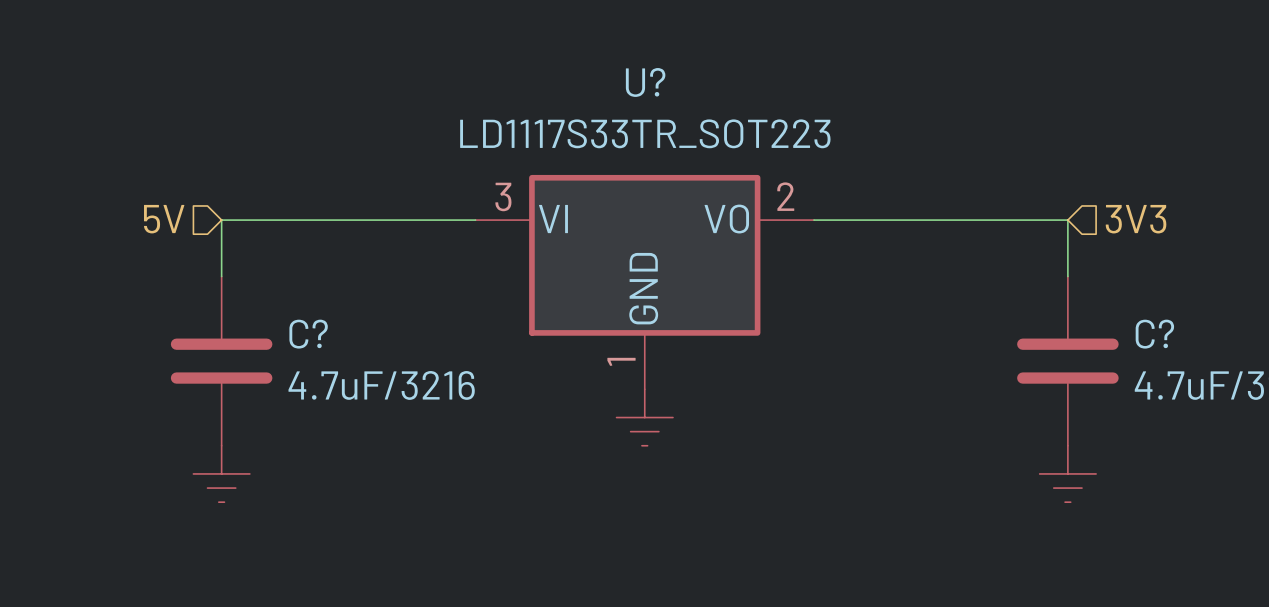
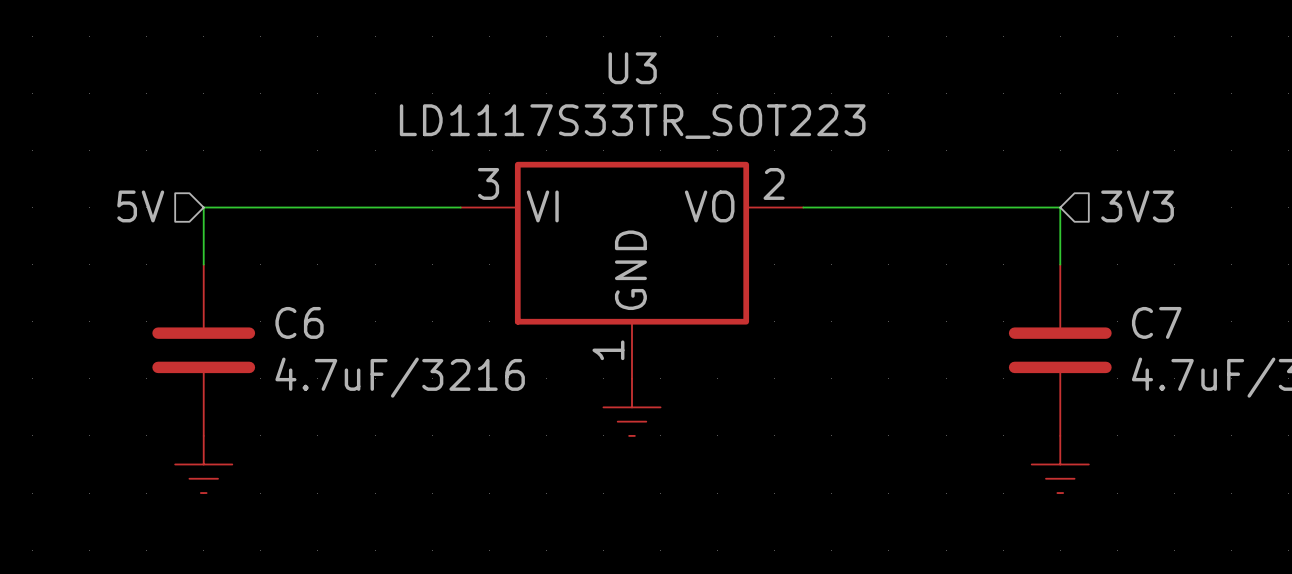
U? name: U? (645, 82) -> U3 (632, 68)
C? name: C? (308, 334) -> C6 (299, 322)
C? name: C? (1154, 334) -> C7 (1156, 322)

